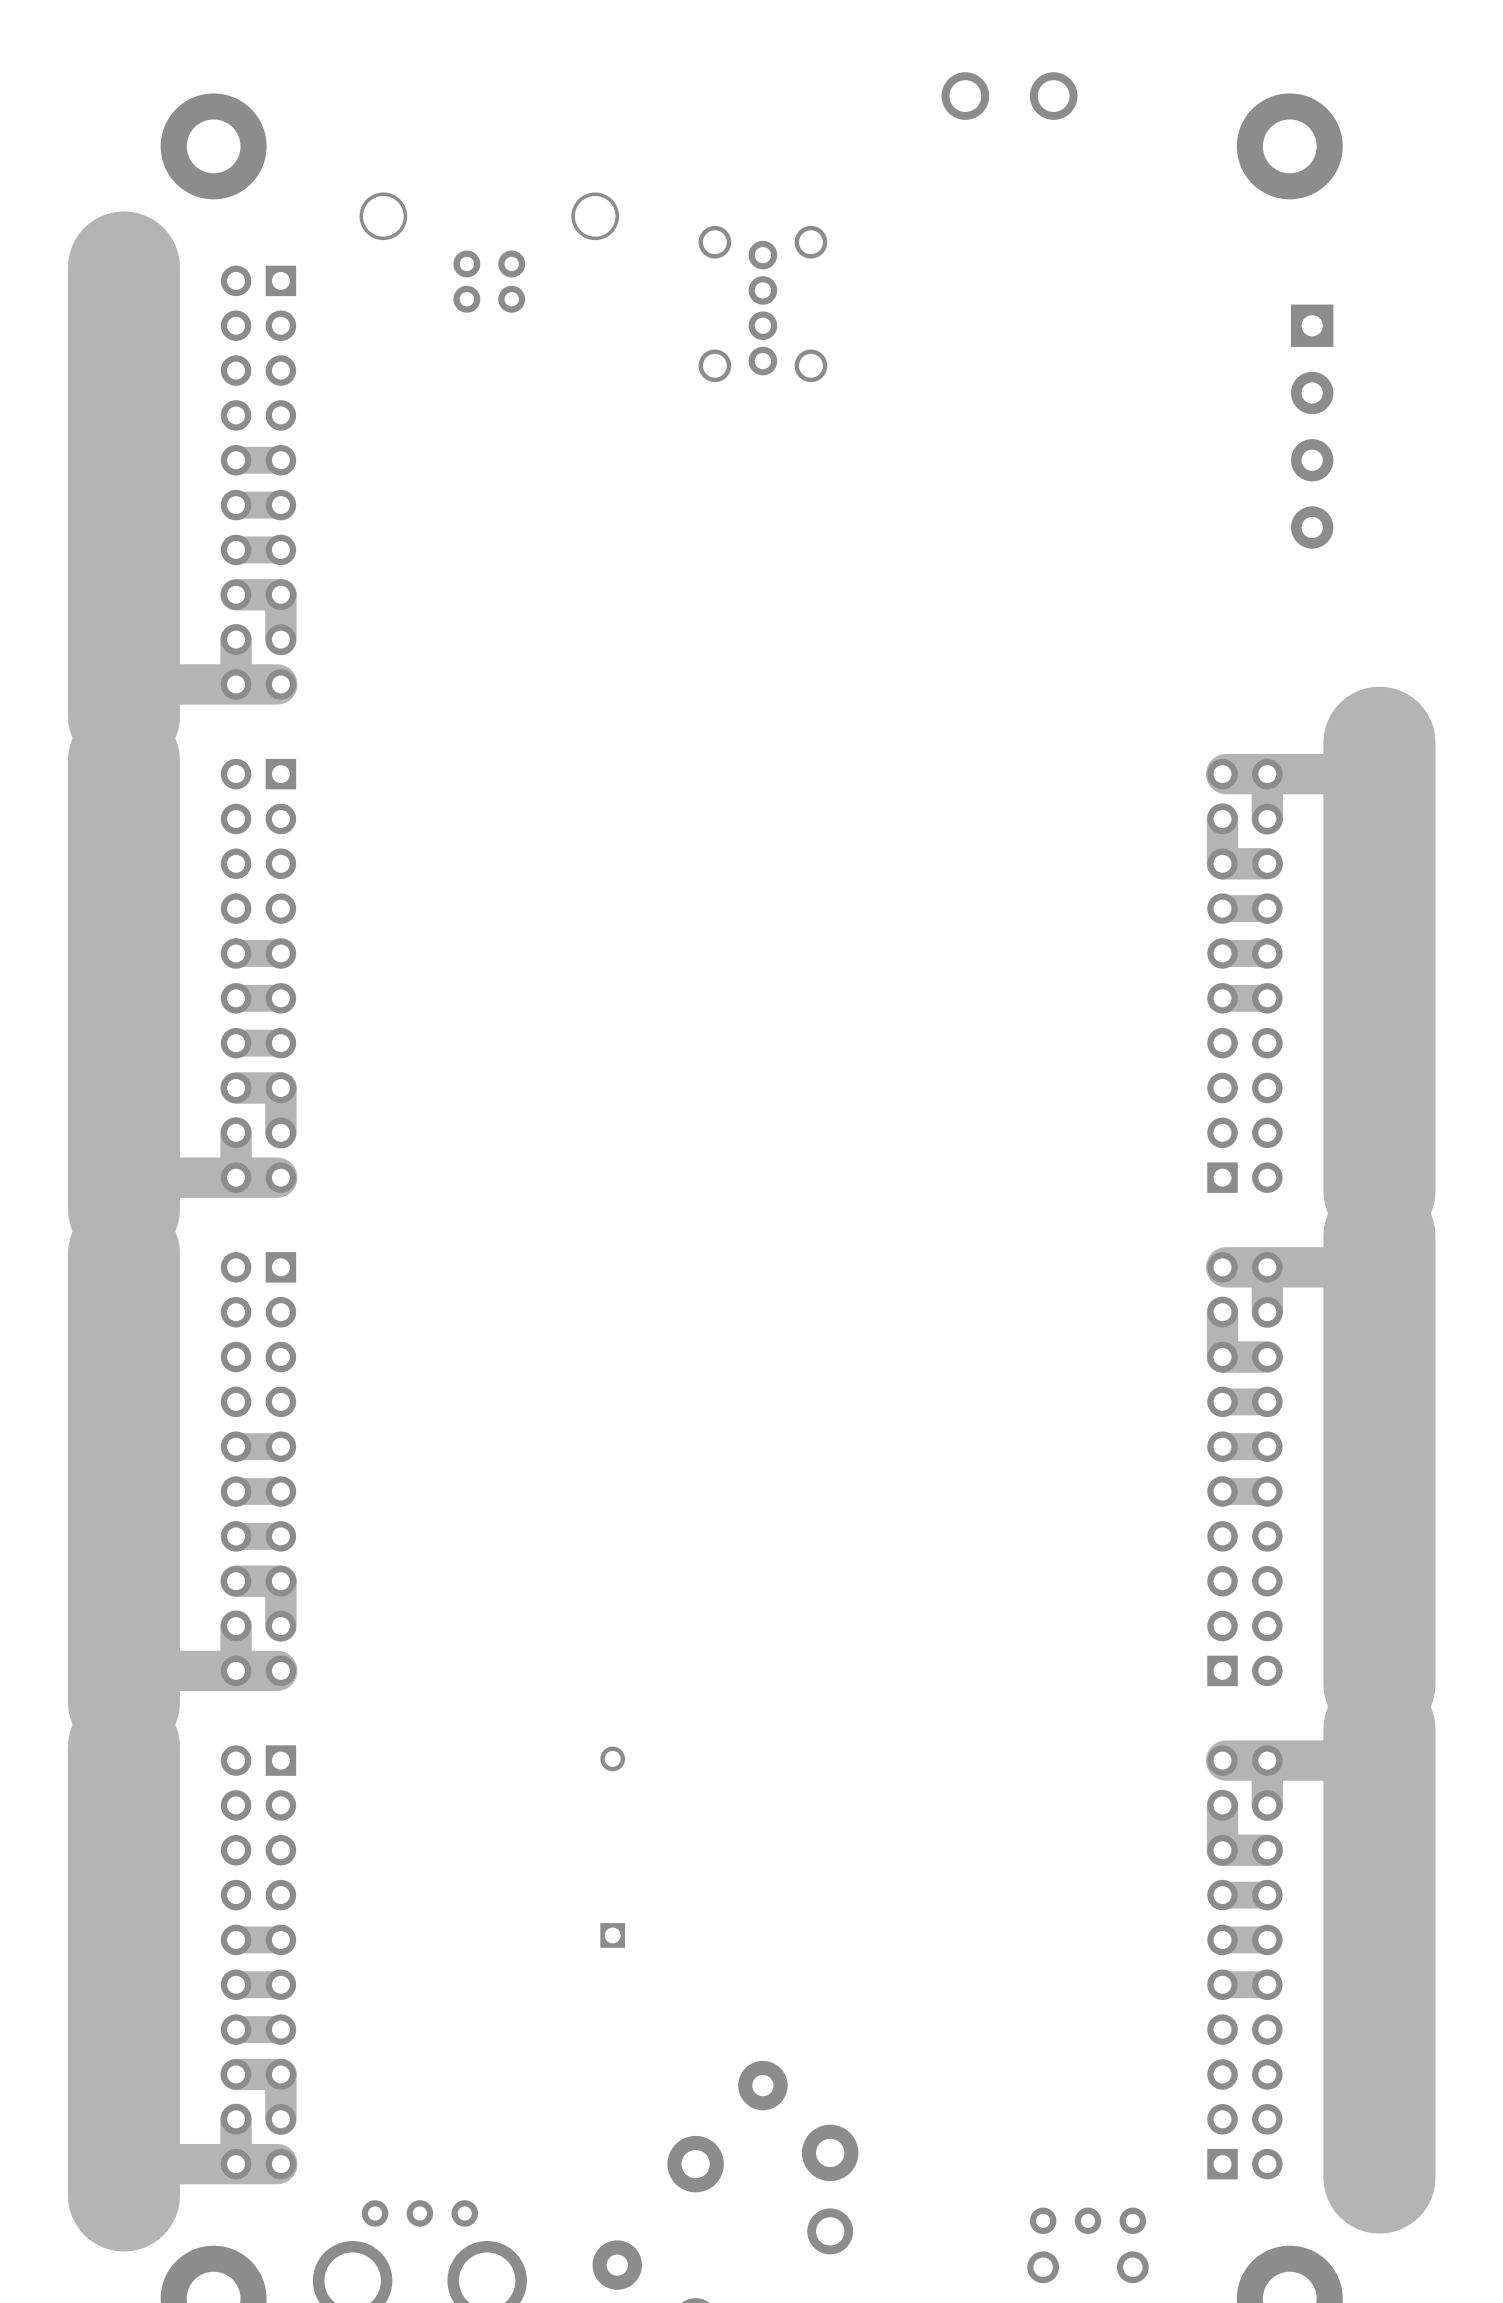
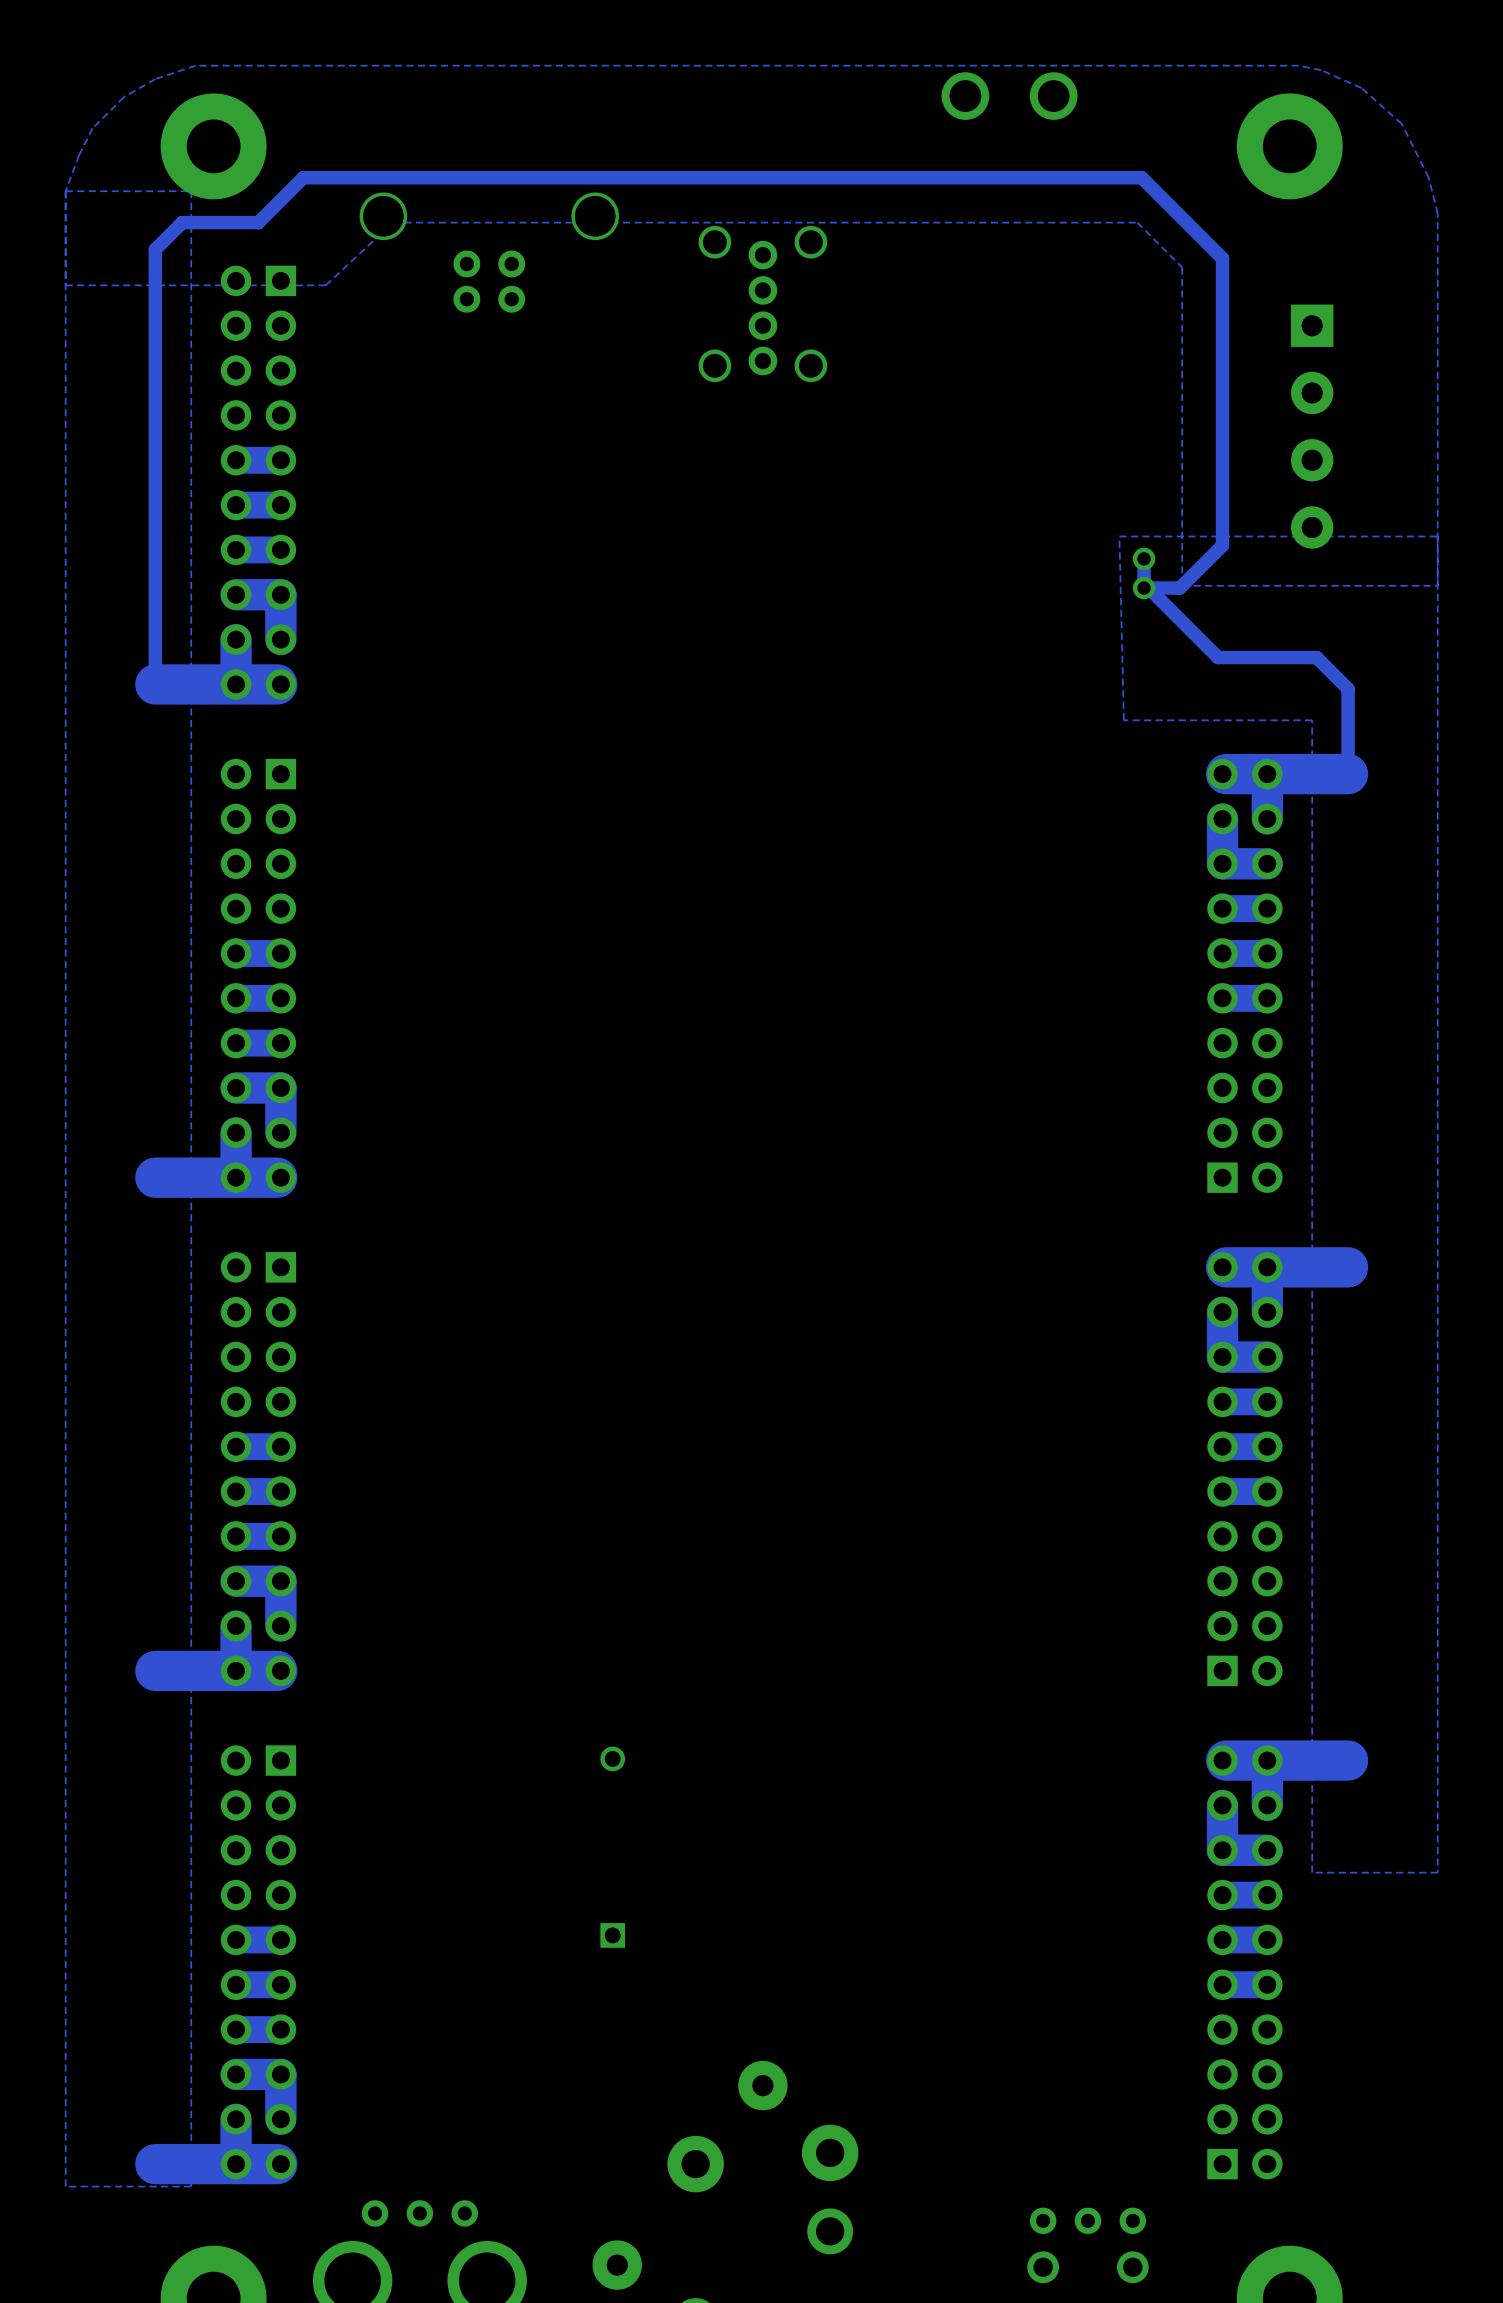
zone outline: none -> (65, 191) (65, 2186) (191, 2186) (191, 191) (65, 191)
zone outline: none -> (65, 191) (79, 155) (92, 128) (123, 97) (155, 79) (195, 65) (1298, 65) (1321, 70) (1361, 88) (1401, 123) (1428, 177) (1437, 213) (1437, 1872) (1312, 1872) (1312, 720) (1123, 720) (1119, 536) (1437, 536)
track: (123, 267) (123, 715) -> none
zone outline: none -> (65, 285) (325, 285) (392, 222) (1137, 222) (1182, 267) (1182, 585) (1437, 585)
track: none -> (1144, 558) (1144, 588) (1179, 588) (1222, 545) (1222, 258) (1141, 177) (303, 177) (258, 222) (182, 222) (155, 249) (155, 684)
via: none -> (1144, 558)
track: none -> (1146, 585) (1218, 657) (1316, 657) (1348, 688) (1348, 774)
via: none -> (1144, 588)
track: (1379, 742) (1379, 1191) -> none
track: (123, 760) (123, 1209) -> none
track: (1379, 1235) (1379, 1684) -> none
track: (123, 1253) (123, 1702) -> none
track: (1379, 1729) (1379, 2177) -> none
track: (123, 1747) (123, 2195) -> none

